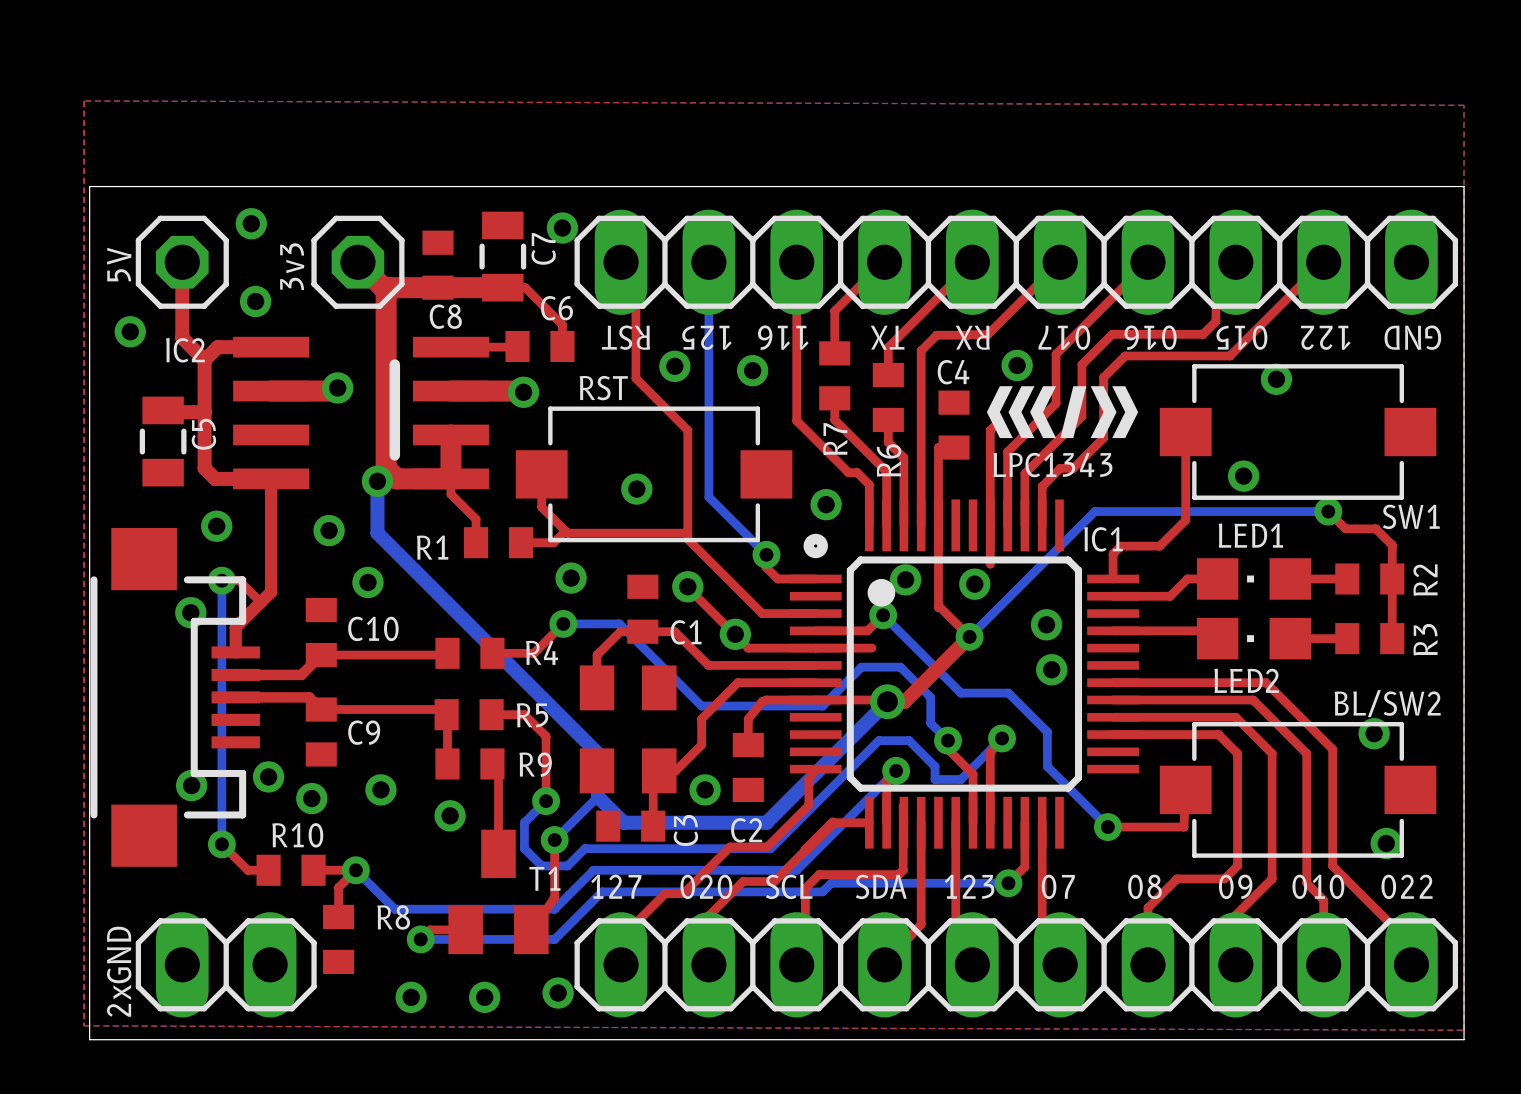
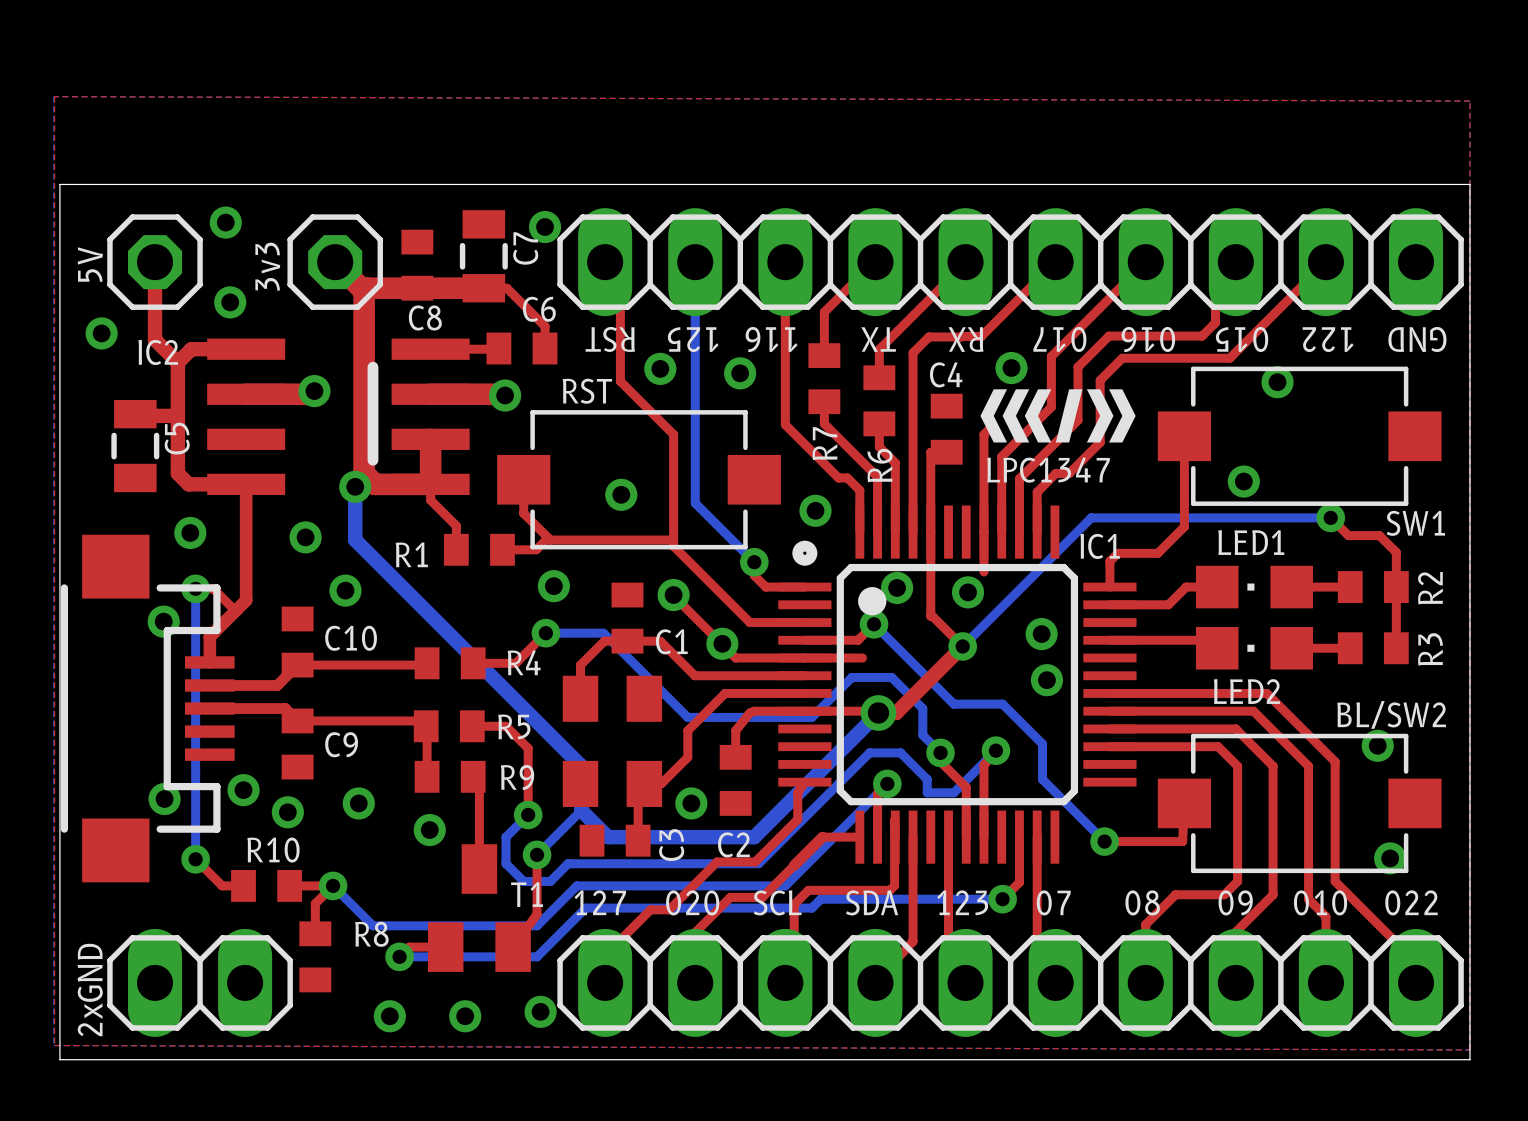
text: LPC1343 (1052, 465) -> LPC1347 (1048, 470)

